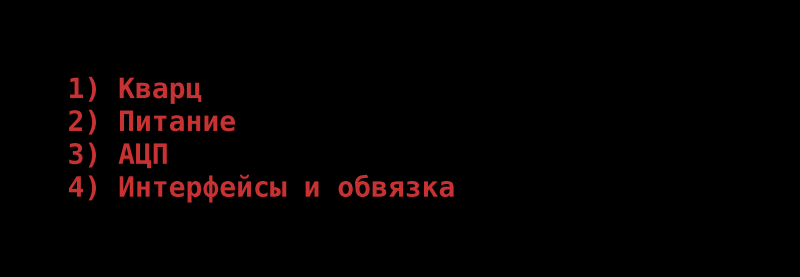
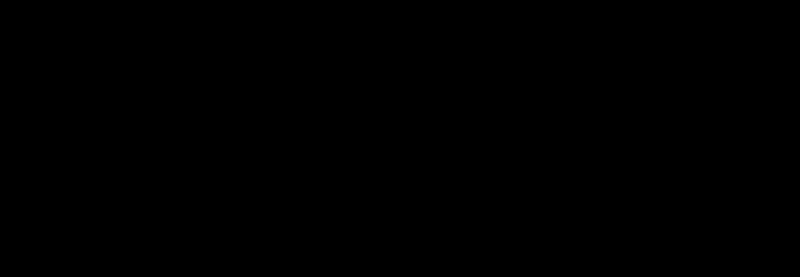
text: 1) Кварц (135, 90) -> none
text: 2) Питание (152, 122) -> none
text: 3) АЦП (118, 155) -> none
text: 4) Интерфейсы и обвязка (261, 188) -> none

